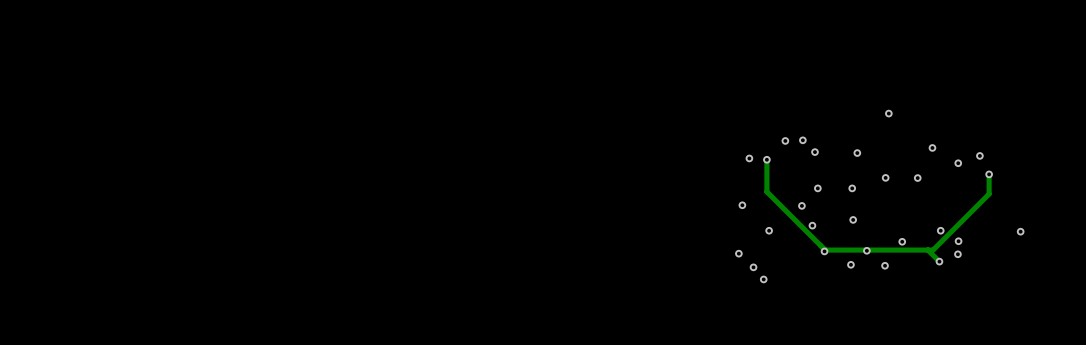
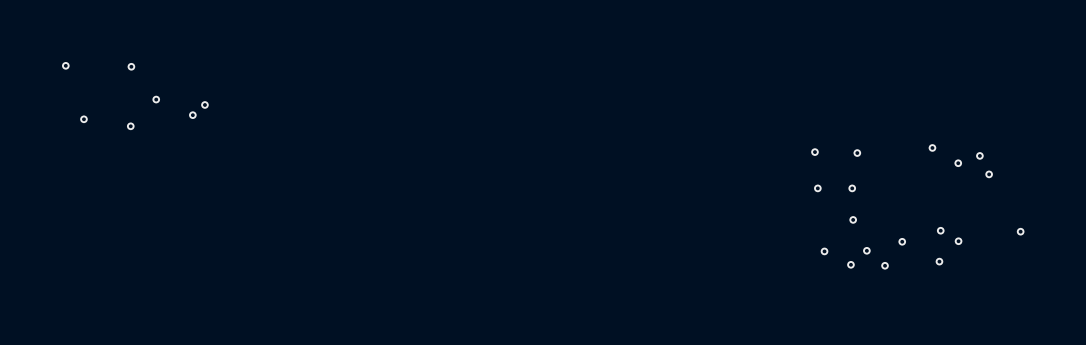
via: none -> (65, 65)
via: none -> (131, 66)
via: none -> (156, 99)
via: none -> (204, 104)
via: (888, 113) -> none
via: none -> (192, 115)
via: none -> (83, 119)
via: none -> (130, 126)
via: (785, 140) -> none
via: (802, 140) -> none
via: (749, 158) -> none
track: (766, 159) (766, 191) (825, 250) (933, 250) (989, 194) (989, 174) -> none
via: (766, 159) -> none
via: (885, 177) -> none
via: (917, 178) -> none
via: (742, 205) -> none
via: (801, 205) -> none
via: (812, 225) -> none
via: (769, 230) -> none
track: (927, 250) (939, 261) -> none
via: (738, 253) -> none
via: (957, 254) -> none
via: (753, 267) -> none
via: (763, 279) -> none

